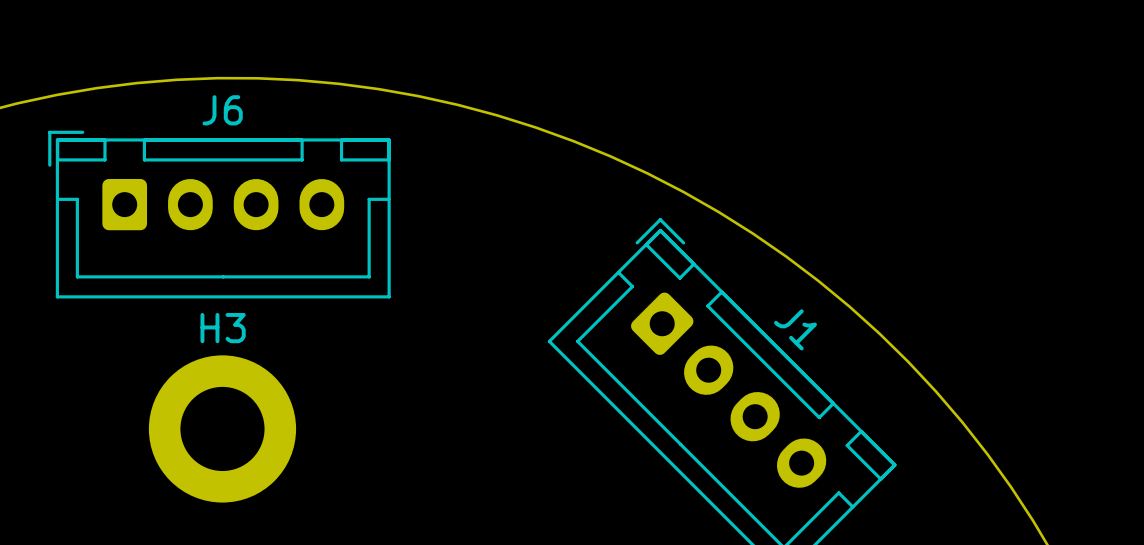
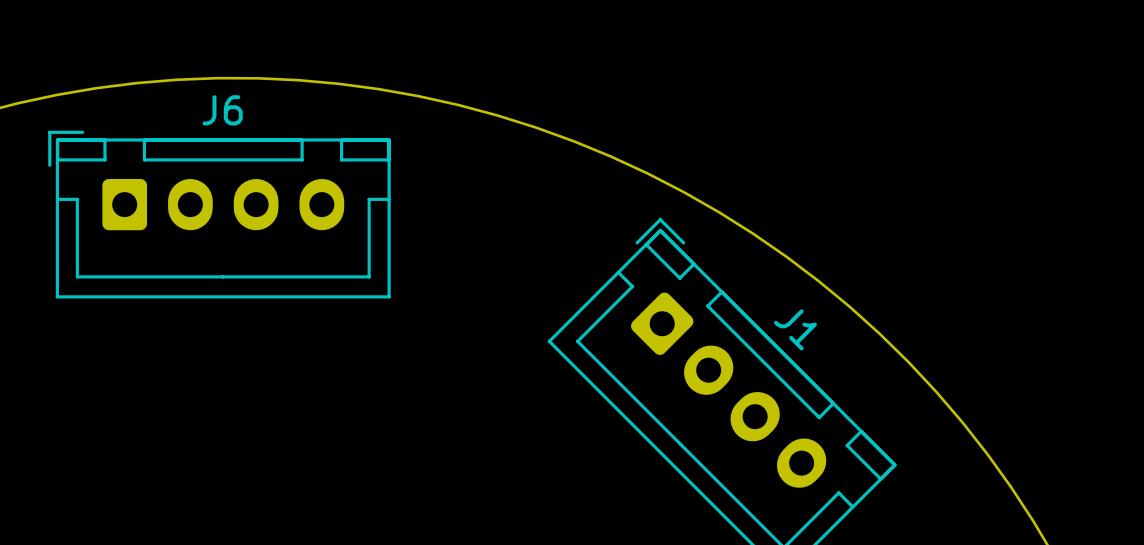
H3: (222, 428) -> none

